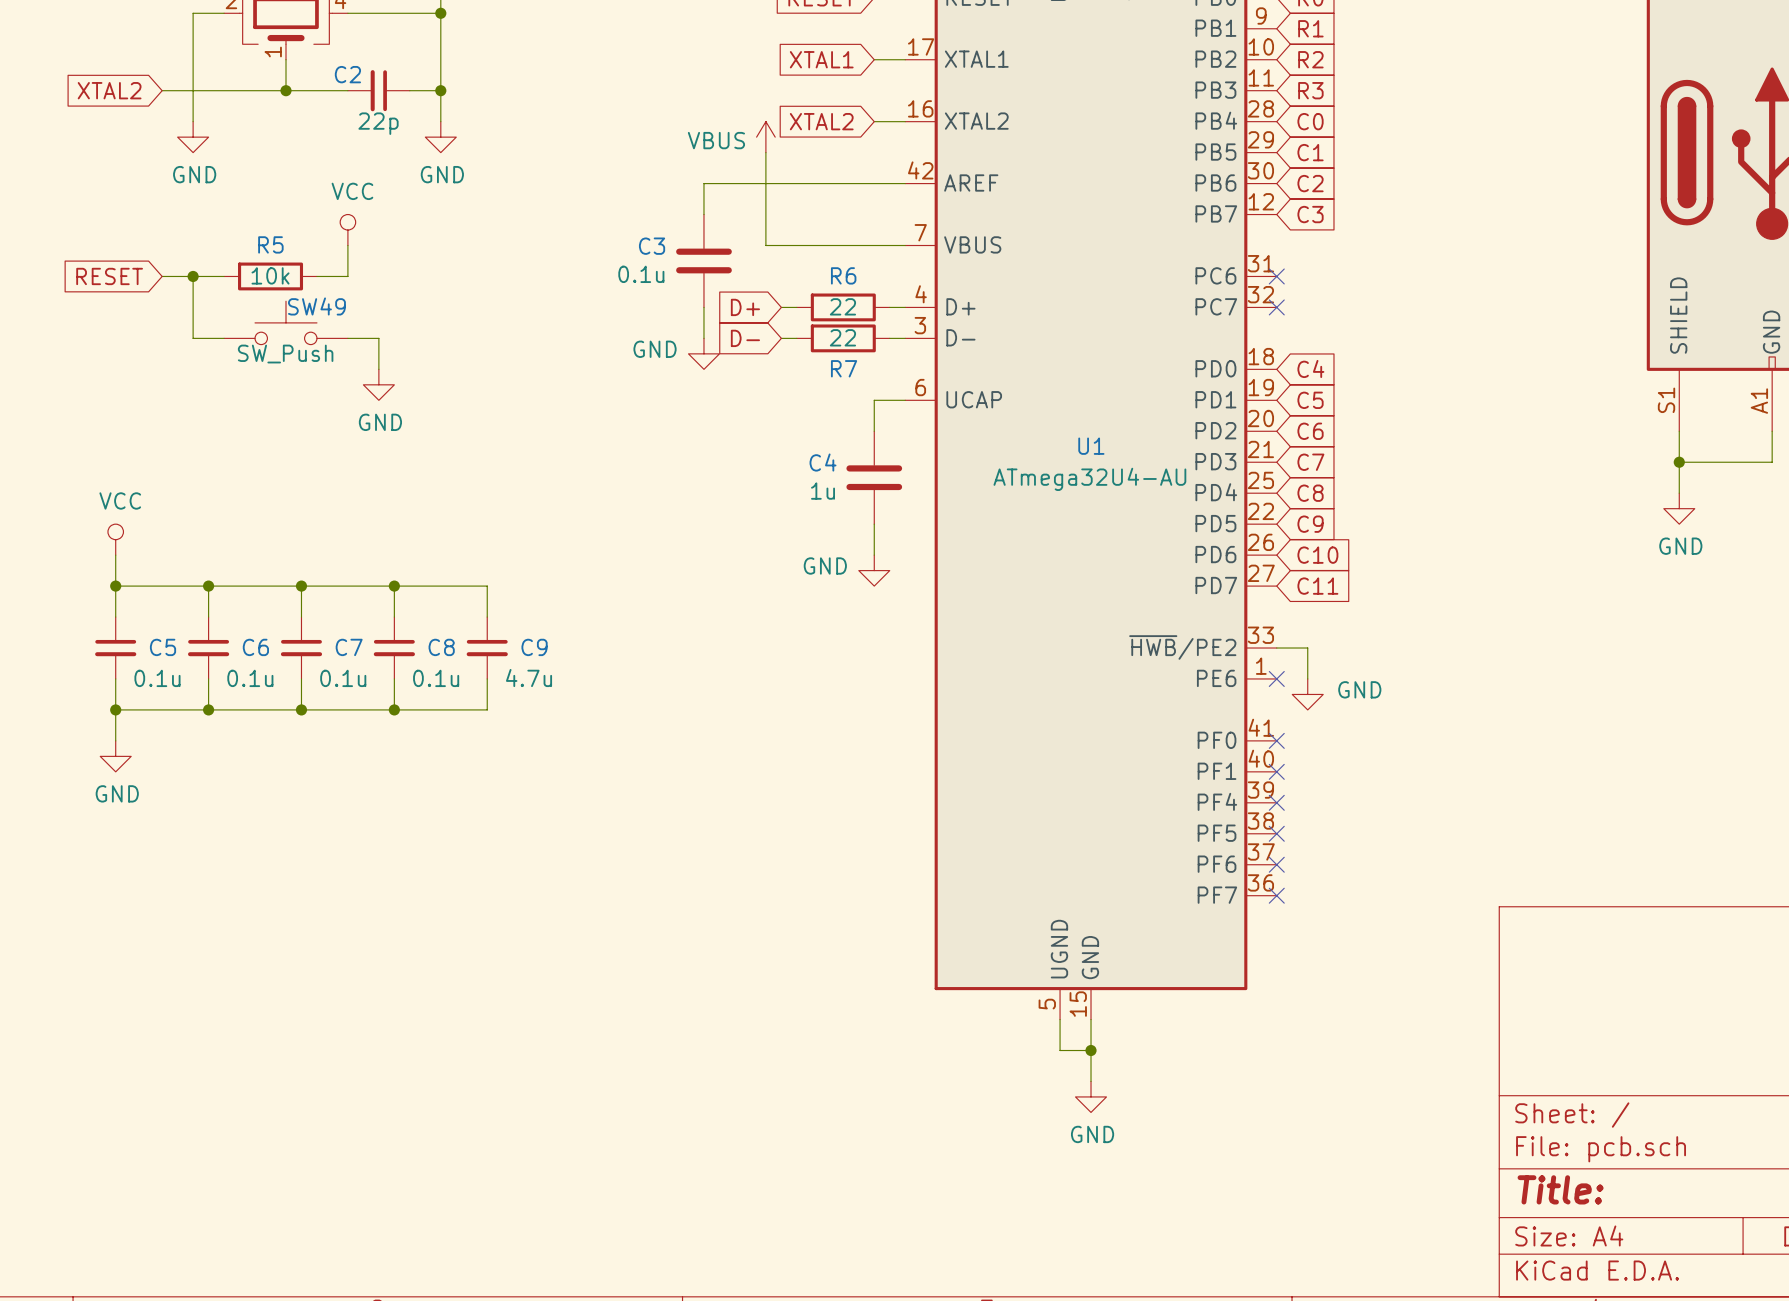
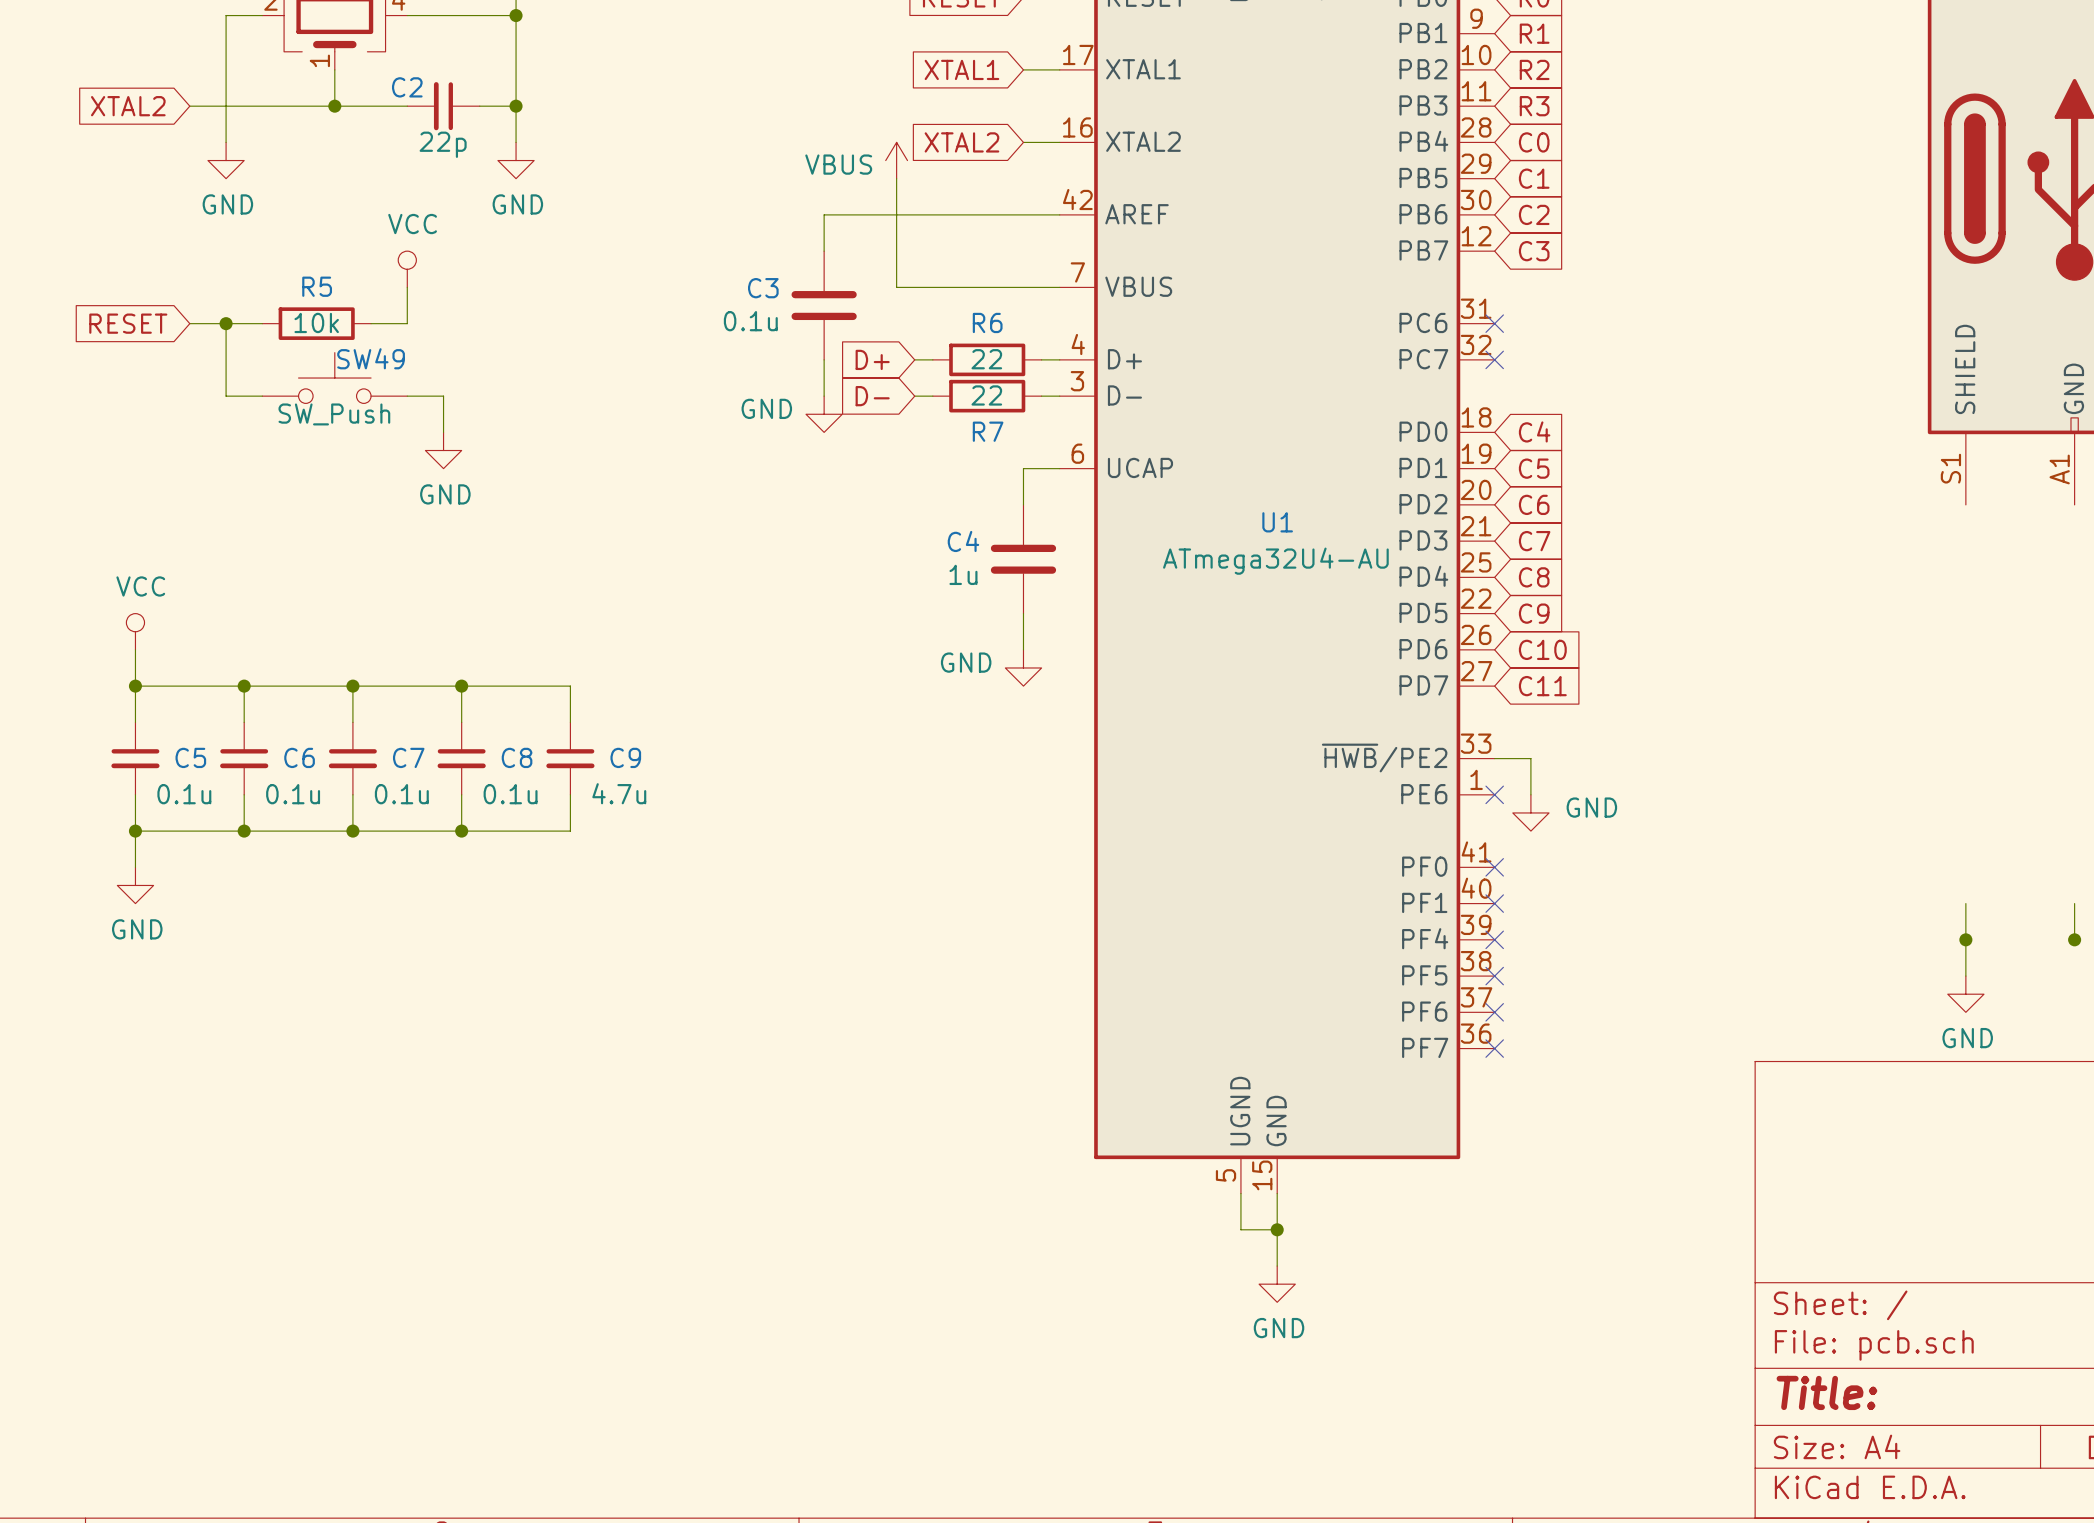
wire: (1679, 431) (1679, 493) -> none
wire: (1772, 431) (1772, 462) (1679, 462) -> none
junction: (1679, 462) -> none
power symbol: GND (1679, 508) -> none
wire: none -> (1965, 903) (1965, 976)
wire: none -> (2074, 903) (2074, 939)
junction: none -> (1965, 939)
junction: none -> (2074, 939)
power symbol: none -> GND (1965, 994)

